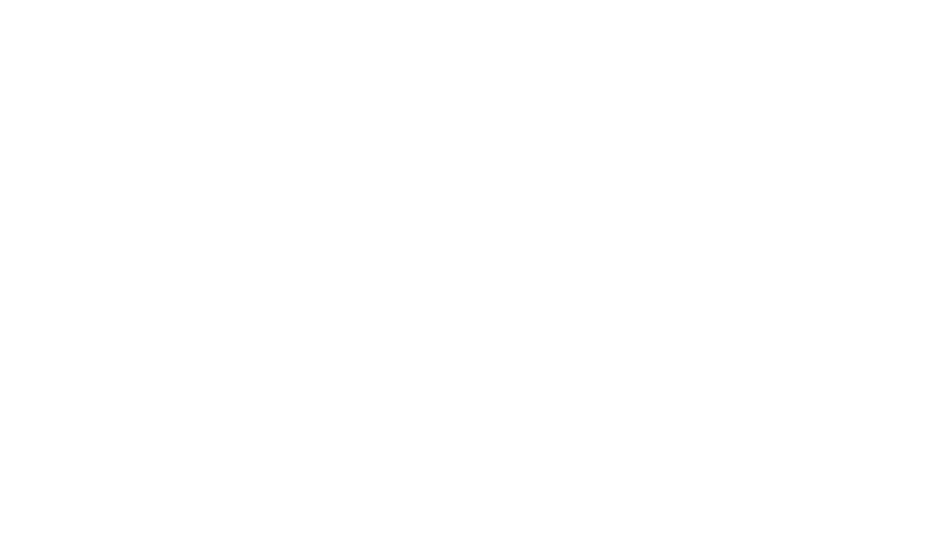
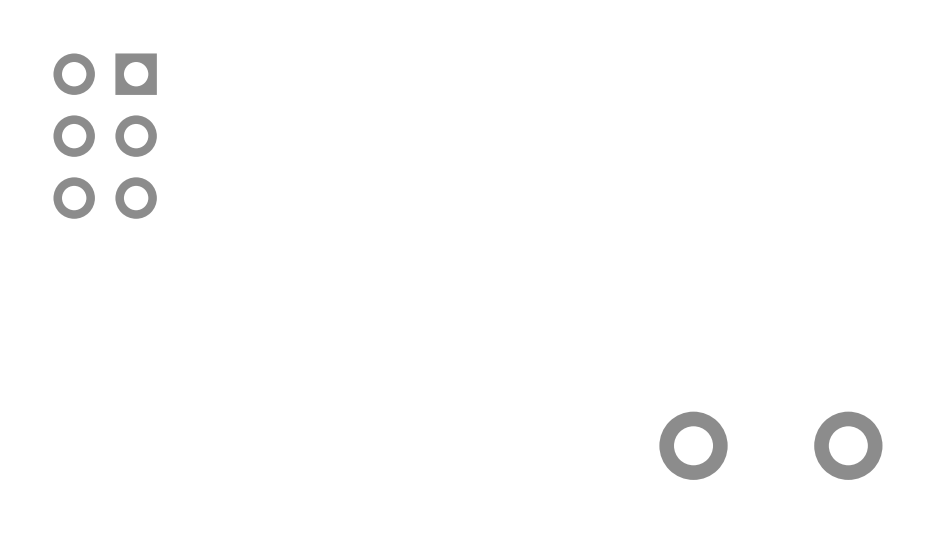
part: none -> (105, 136)
part: none -> (693, 445)
part: none -> (848, 445)

